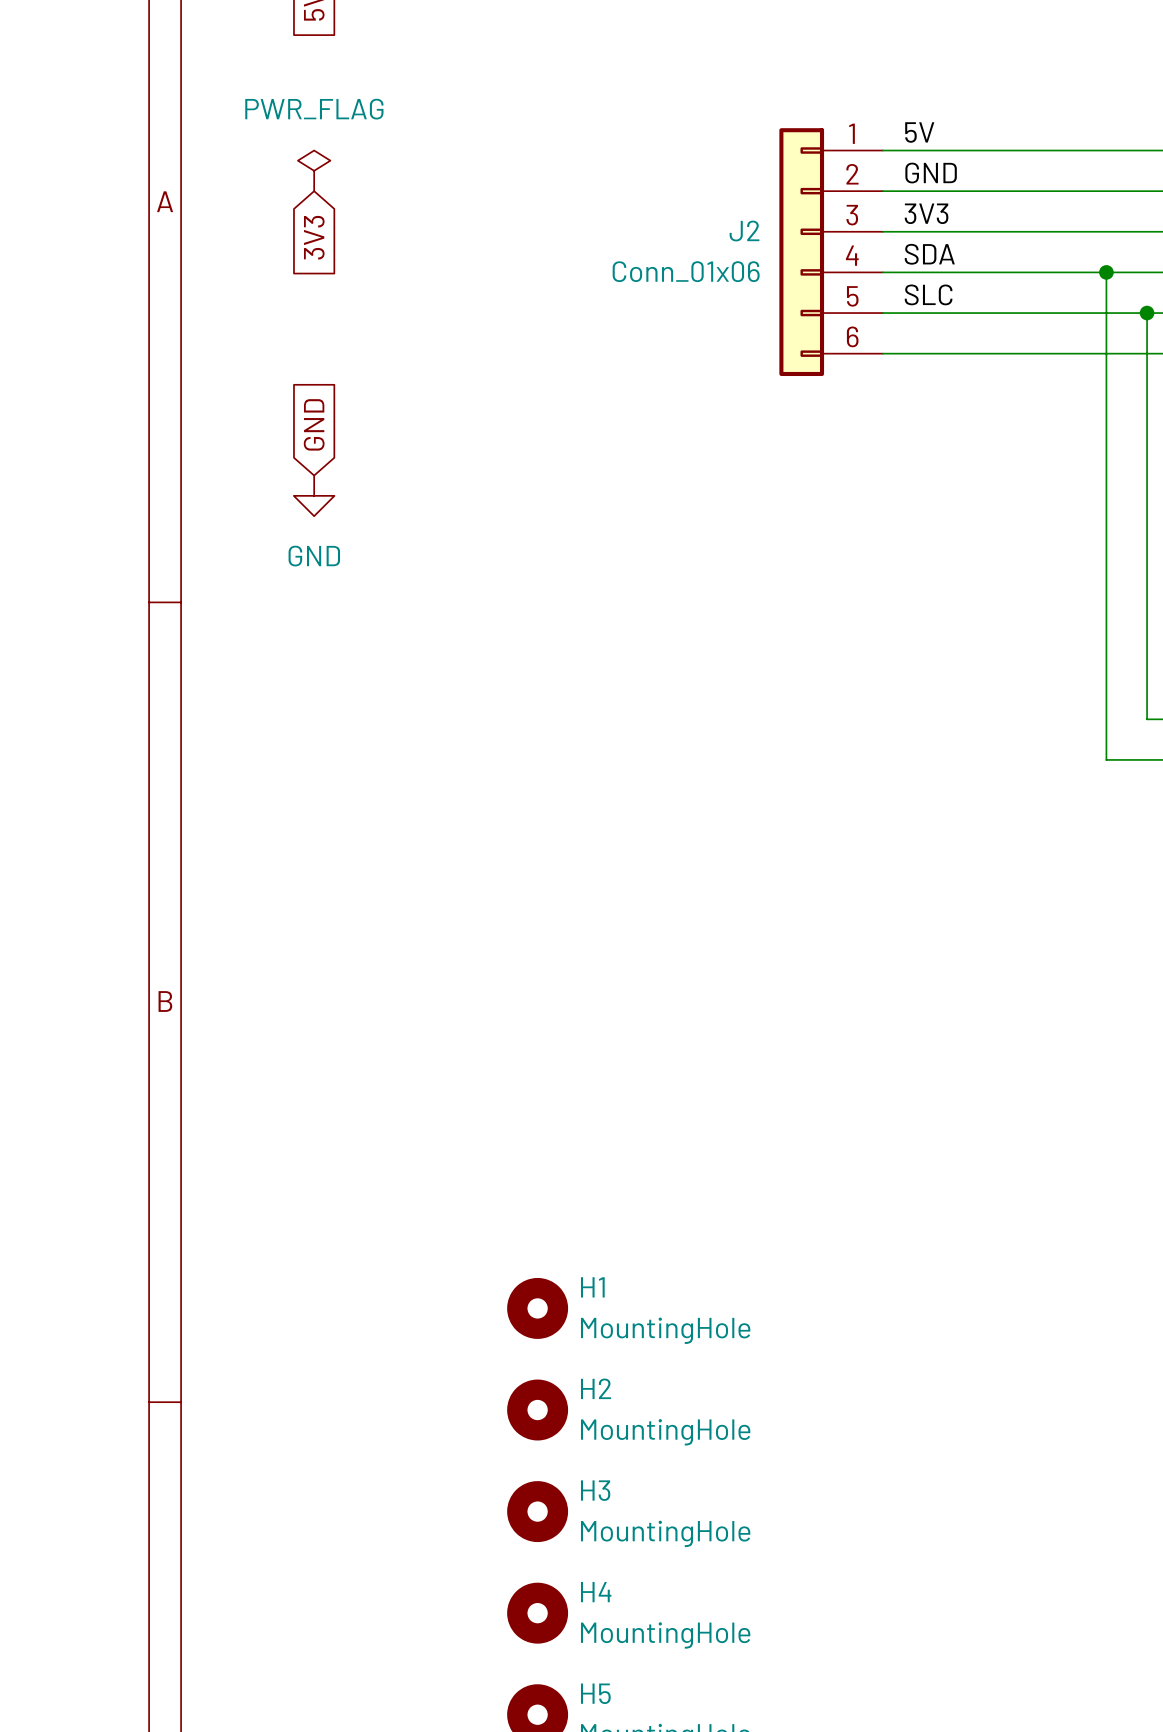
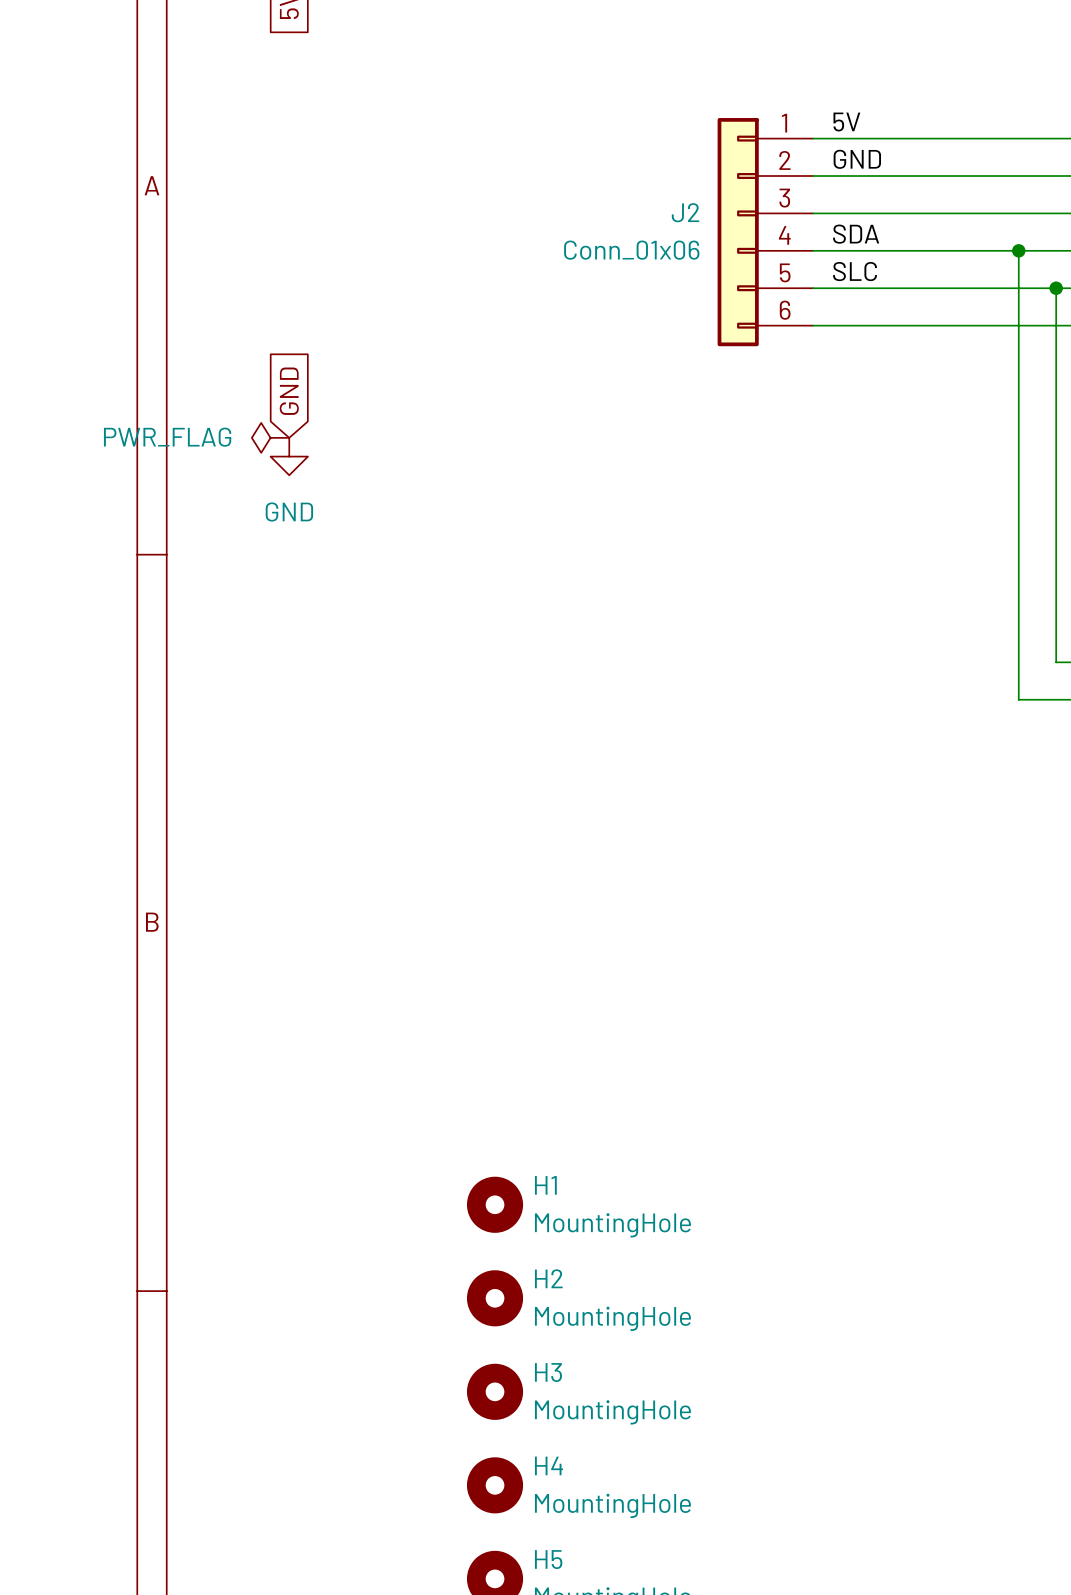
power symbol text position: PWR_FLAG (314, 109) -> PWR_FLAG (167, 437)
power symbol rotation: 0° (314, 170) -> 90° counterclockwise (270, 437)
power symbol position: PWR_FLAG (314, 170) -> PWR_FLAG (270, 437)
label: 3V3 (926, 213) -> none
global label: 3V3 (314, 237) -> none

